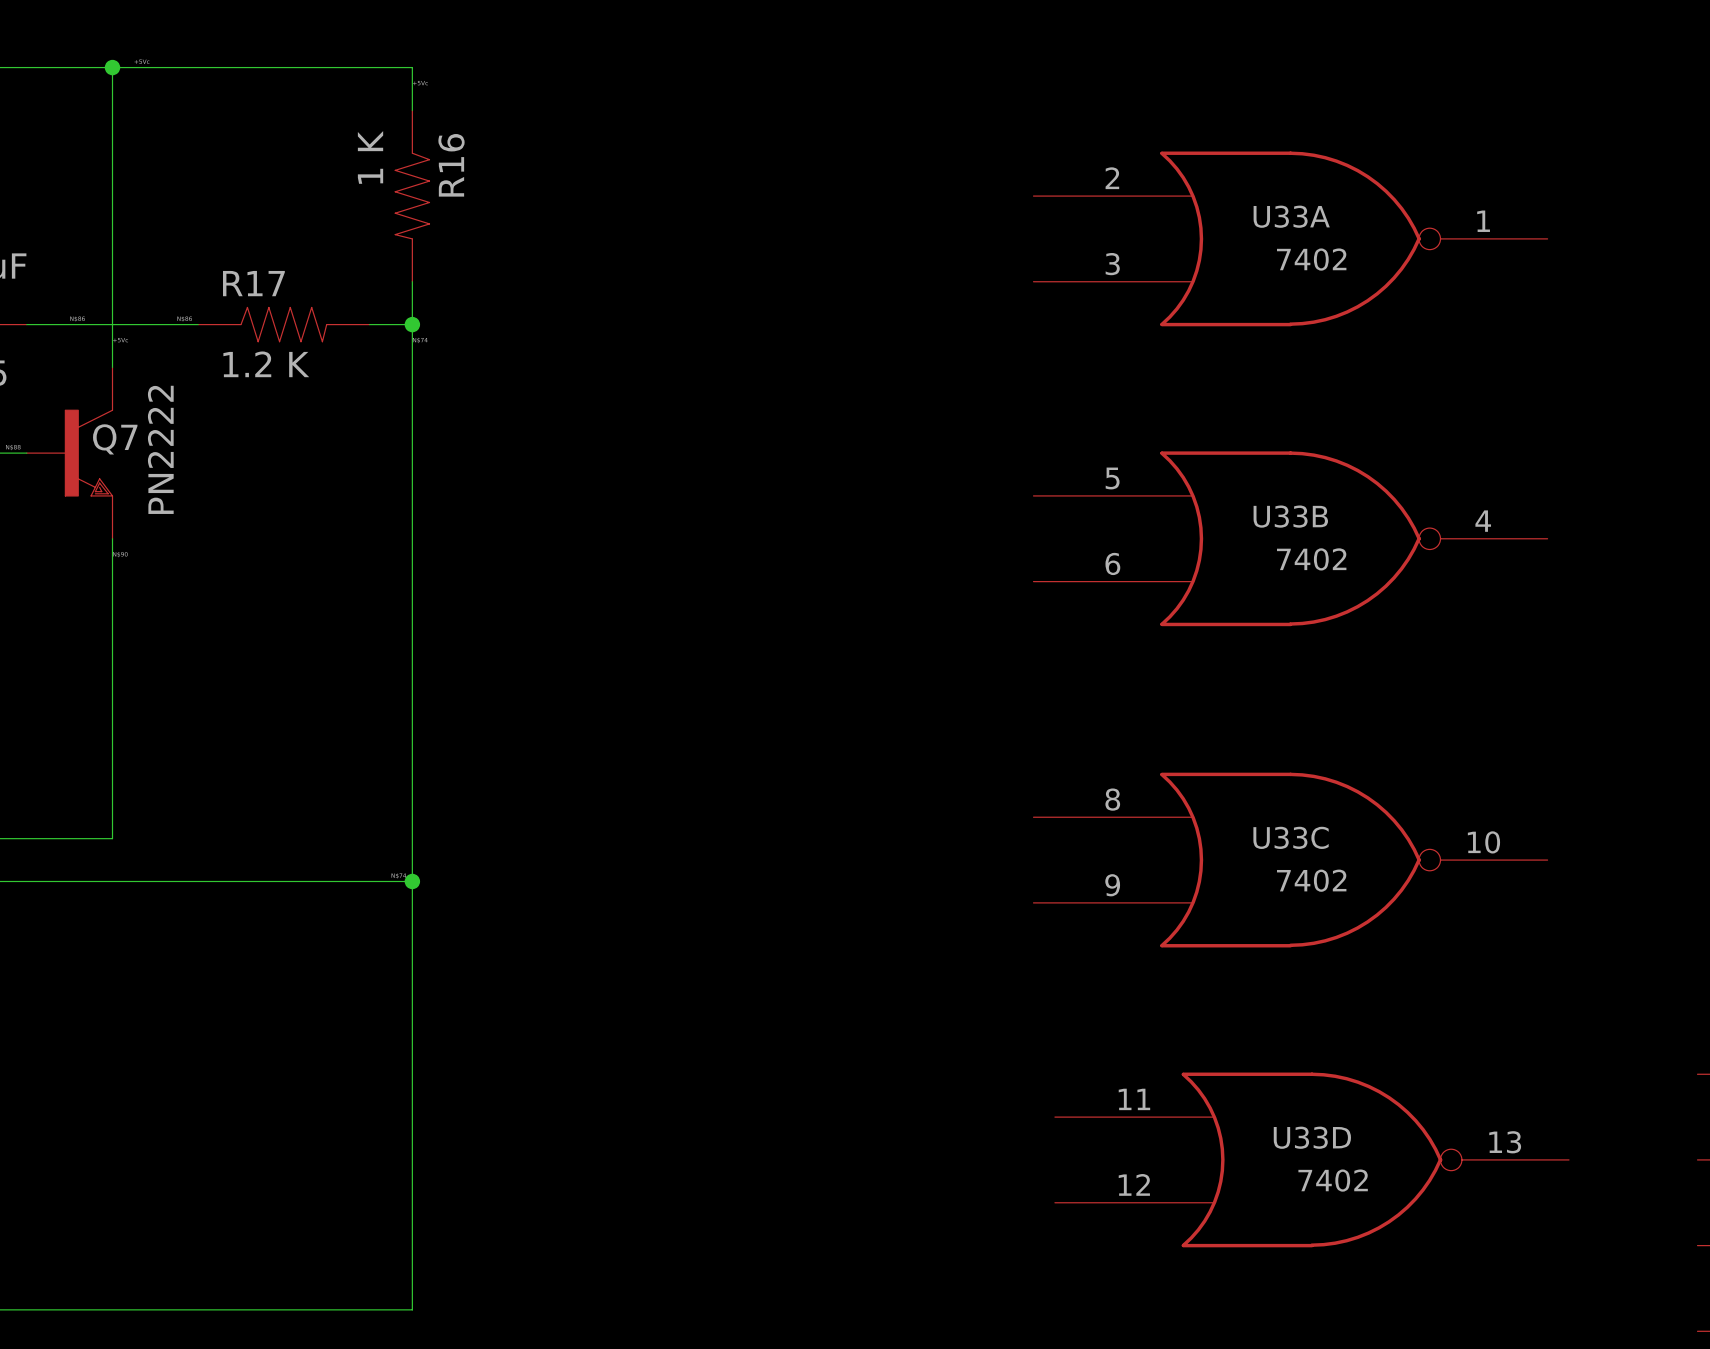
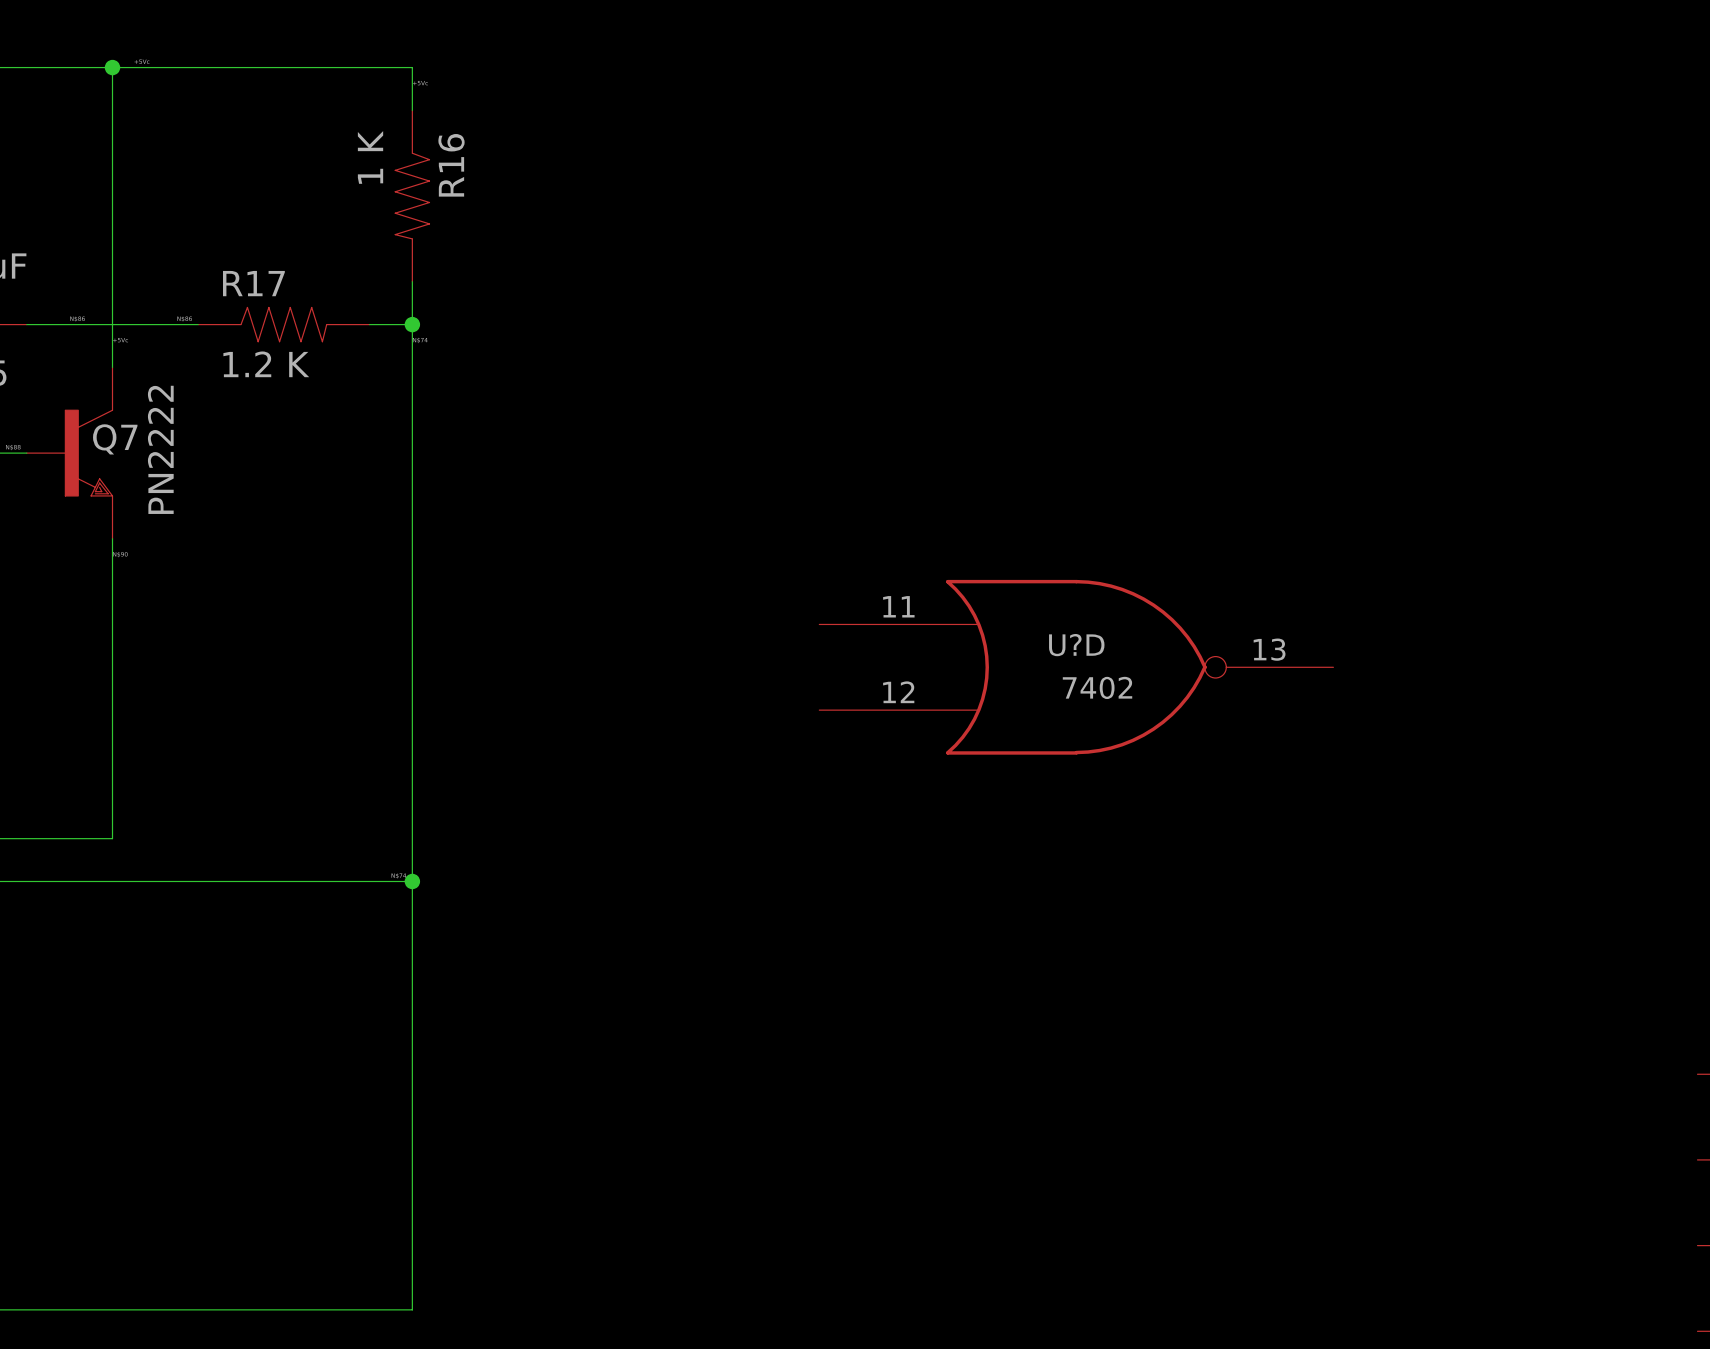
U33A: 7402 (1290, 238) -> none
U33B: 7402 (1290, 538) -> none
U?D: none -> 7402 (1076, 667)
U33C: 7402 (1290, 860) -> none
U33D: 7402 (1311, 1159) -> none

